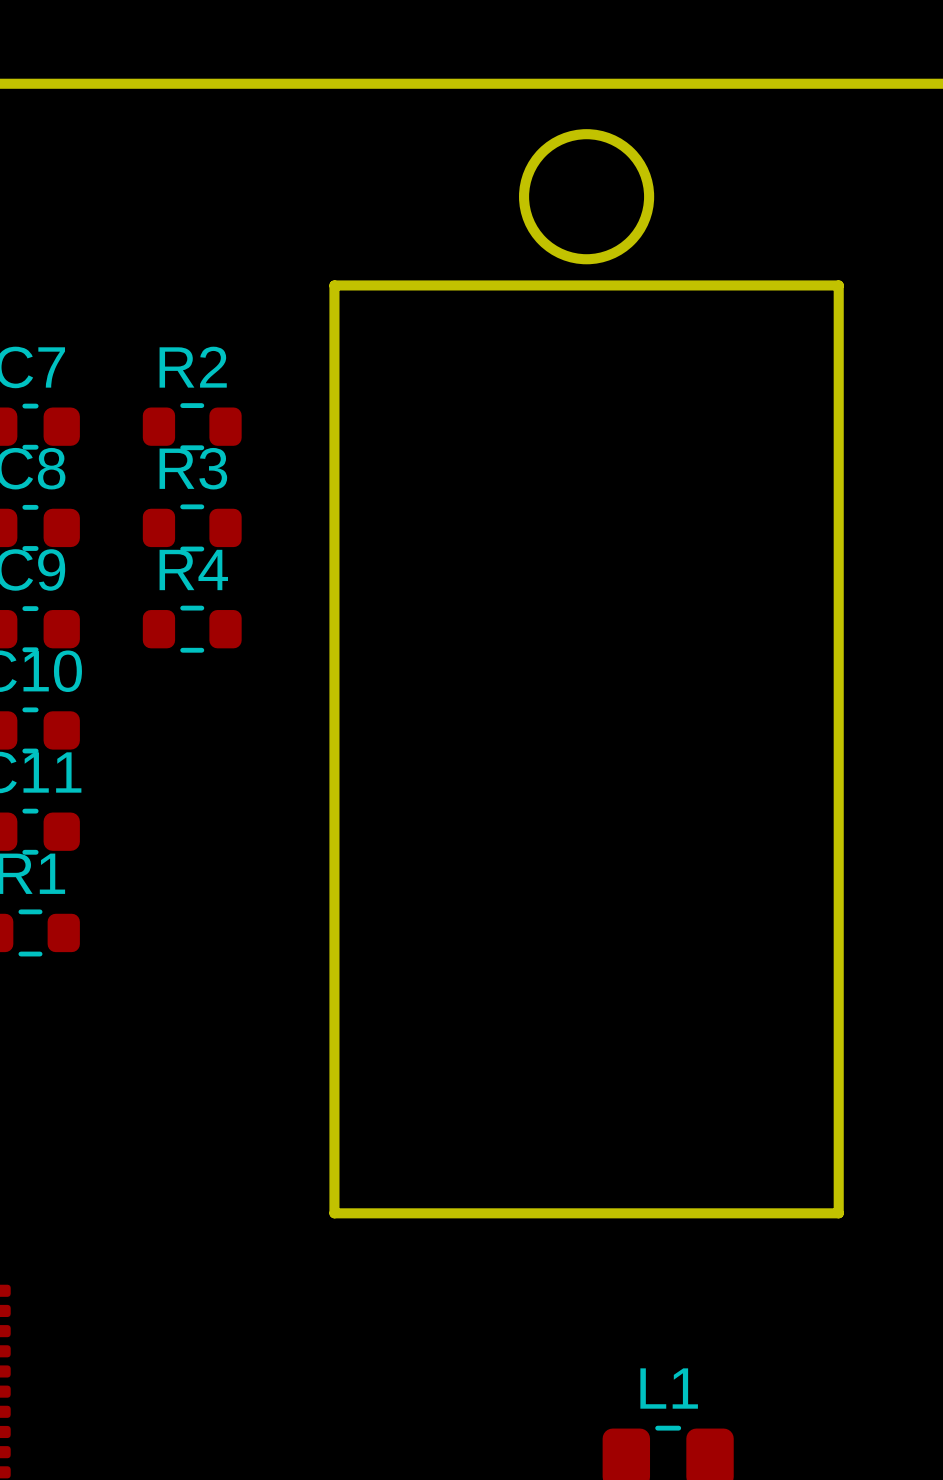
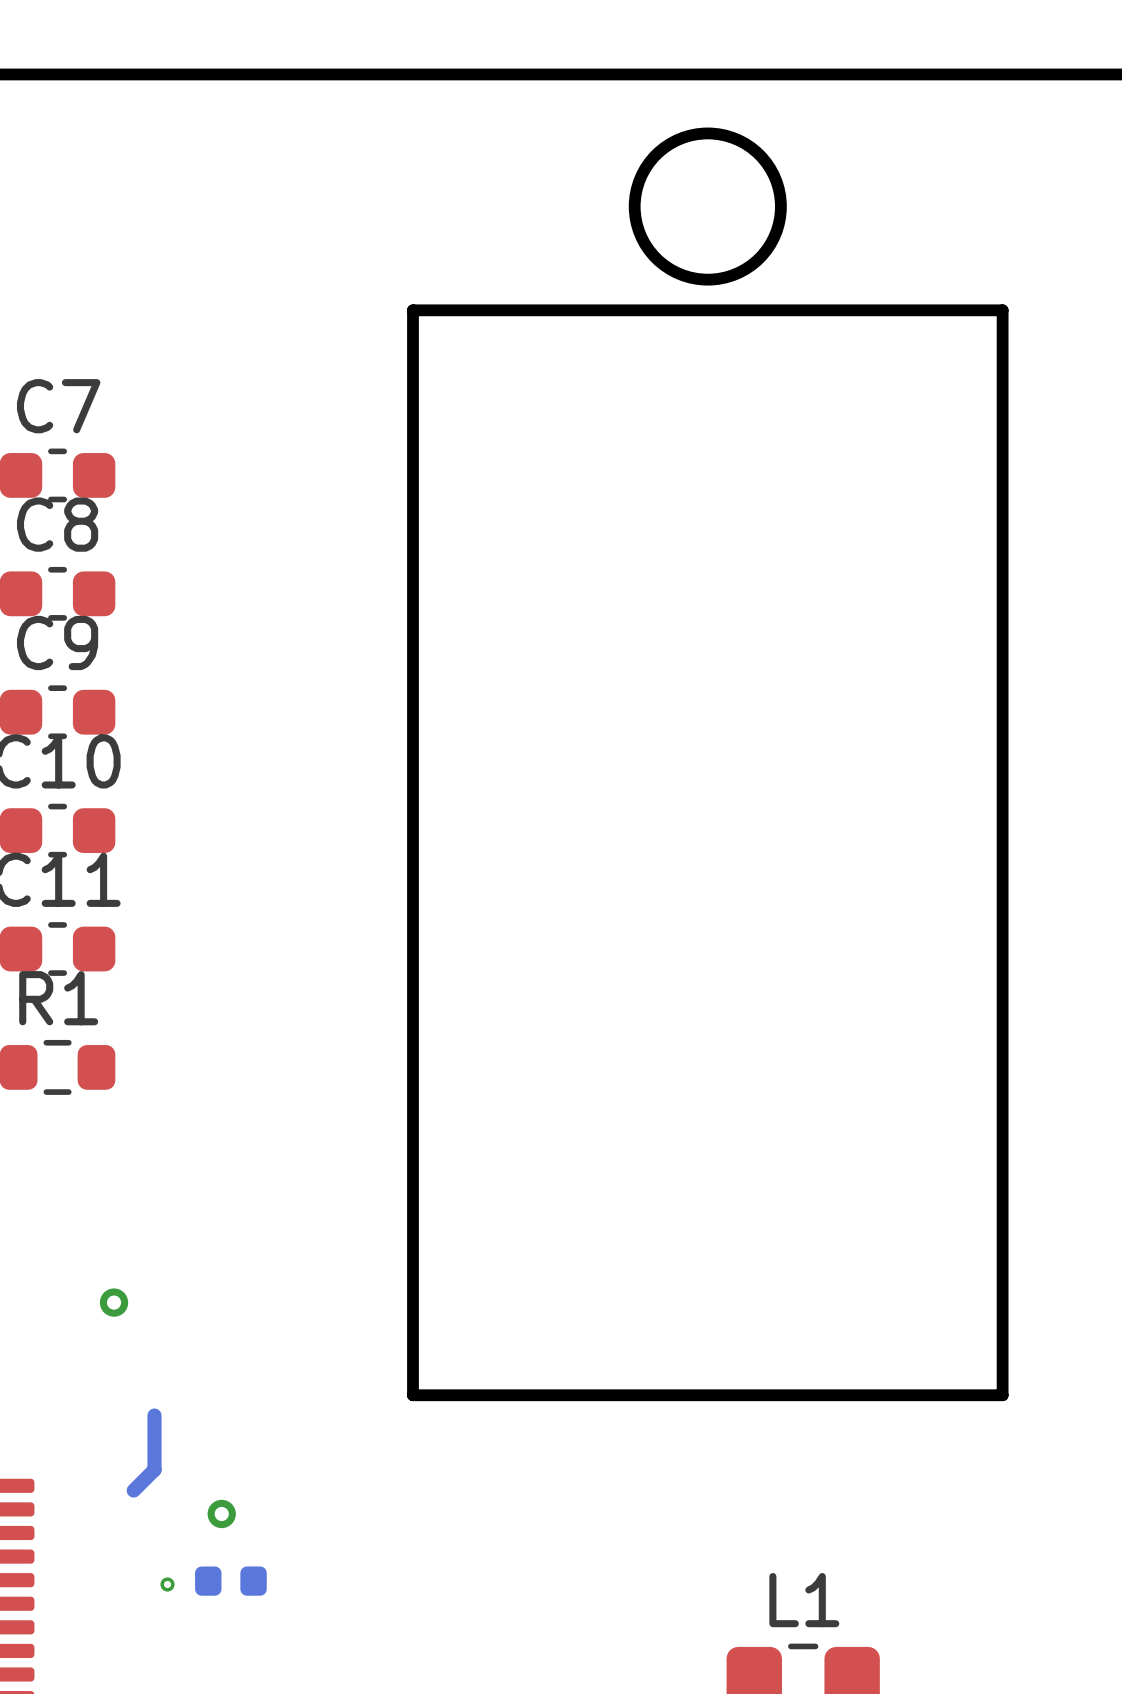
R2: (192, 426) -> none
R3: (192, 527) -> none
R4: (192, 629) -> none
via: none -> (114, 1302)
bottom track: none -> (154, 1415) (154, 1469) (133, 1490)
via: none -> (221, 1513)
part: none -> (230, 1581)
via: none -> (167, 1584)

